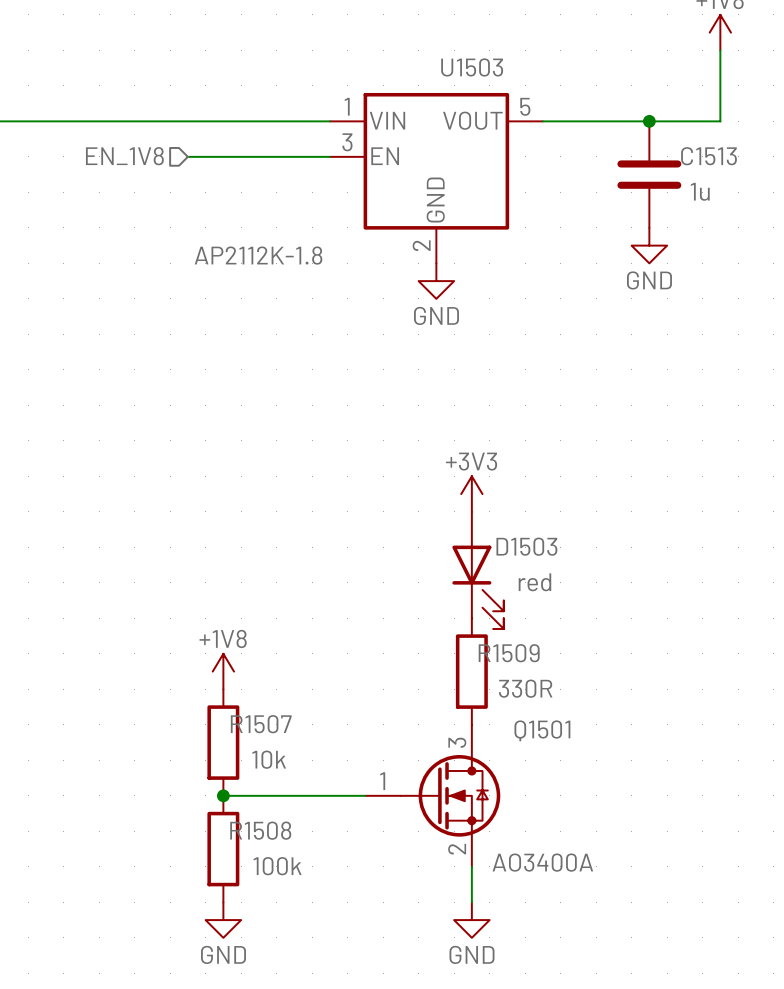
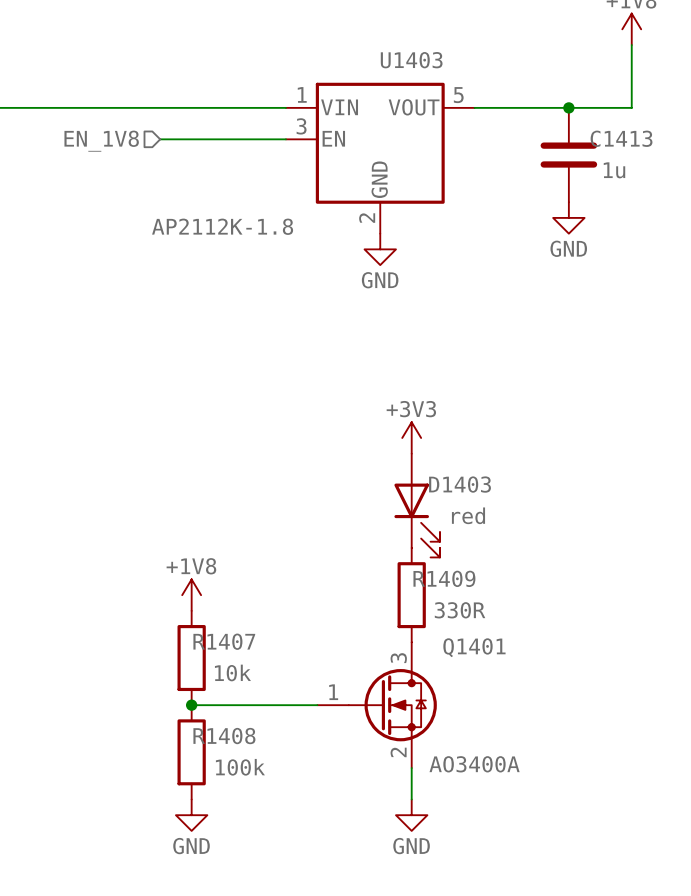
U1503 name: U1503 (472, 67) -> U1403 (411, 60)
C1513 name: C1513 (709, 156) -> C1413 (621, 138)
D1503 name: D1503 (526, 546) -> D1403 (460, 484)
R1509 name: R1509 (509, 653) -> R1409 (444, 578)
R1507 name: R1507 (261, 724) -> R1407 (224, 641)
Q1501 name: Q1501 (542, 730) -> Q1401 (474, 647)
R1508 name: R1508 (260, 830) -> R1408 (224, 736)

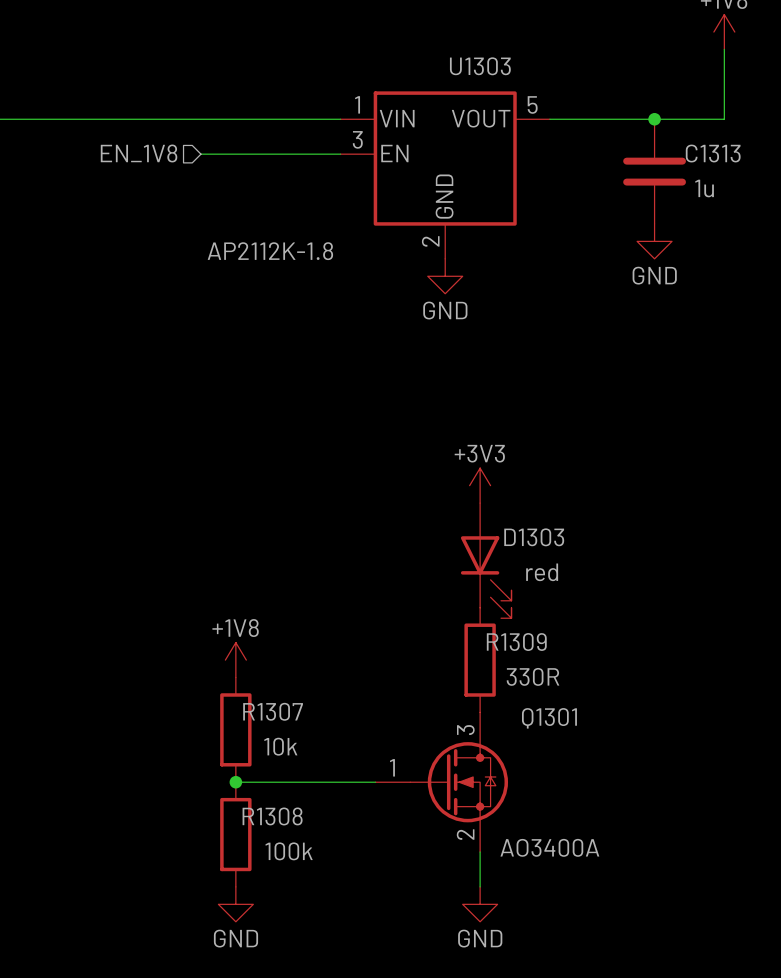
U1403 name: U1403 (411, 60) -> U1303 (480, 66)
C1413 name: C1413 (621, 138) -> C1313 (713, 153)
D1403 name: D1403 (460, 484) -> D1303 (534, 537)
R1409 name: R1409 (444, 578) -> R1309 (516, 642)
R1407 name: R1407 (224, 641) -> R1307 (273, 711)
Q1401 name: Q1401 (474, 647) -> Q1301 (549, 718)
R1408 name: R1408 (224, 736) -> R1308 (272, 816)

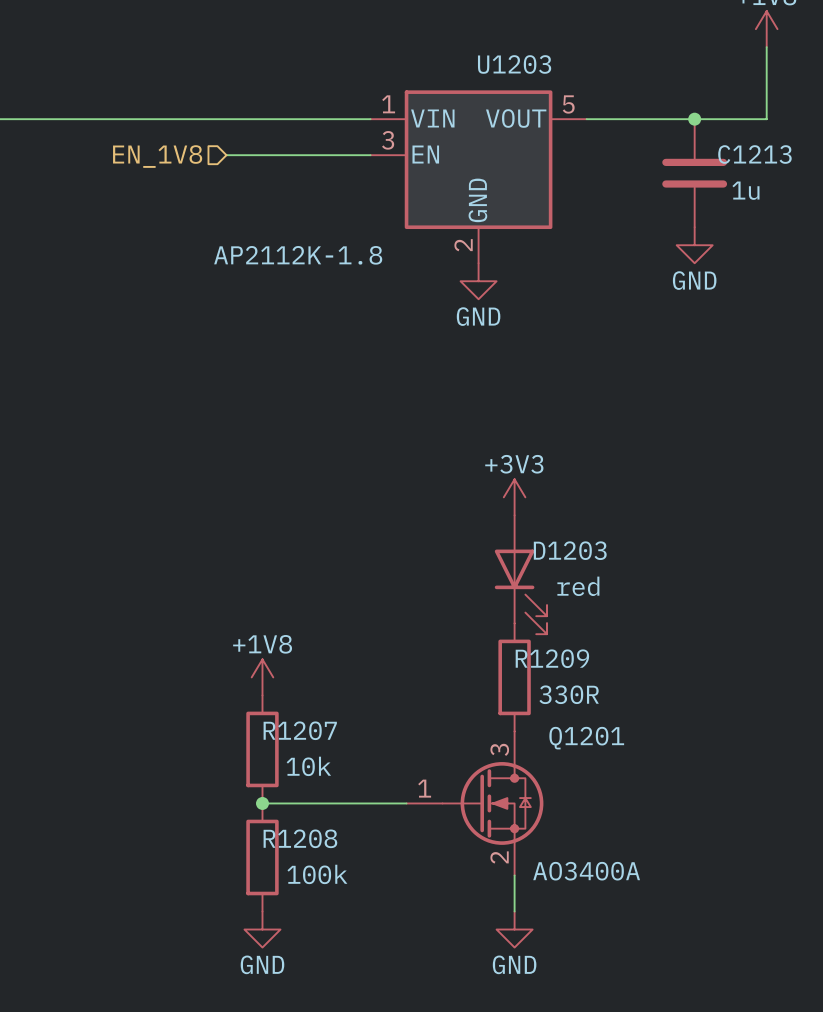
U1303 name: U1303 (480, 66) -> U1203 (514, 64)
C1313 name: C1313 (713, 153) -> C1213 (754, 154)
D1303 name: D1303 (534, 537) -> D1203 (570, 550)
R1309 name: R1309 (516, 642) -> R1209 (552, 658)
R1307 name: R1307 (273, 711) -> R1207 (300, 730)
Q1301 name: Q1301 (549, 718) -> Q1201 (586, 738)
R1308 name: R1308 (272, 816) -> R1208 (300, 838)

